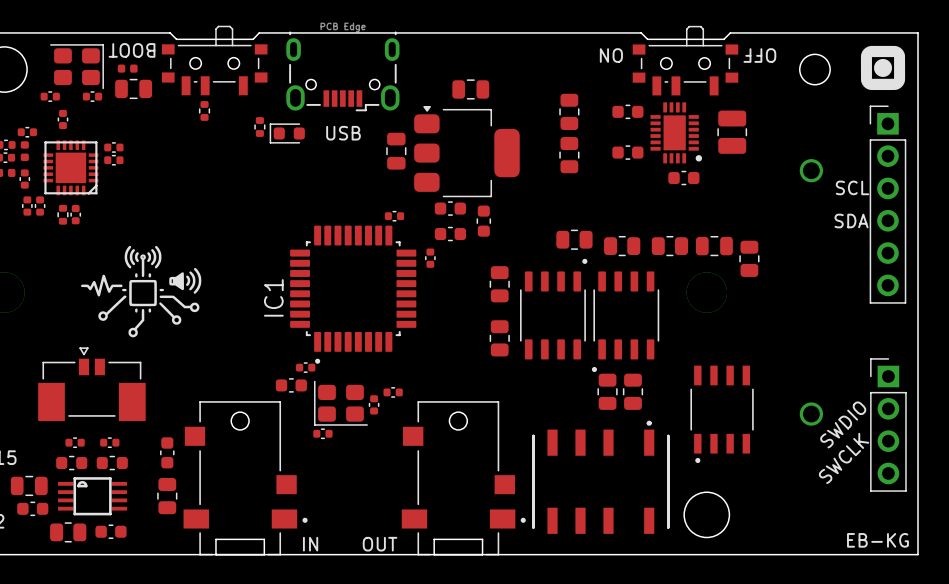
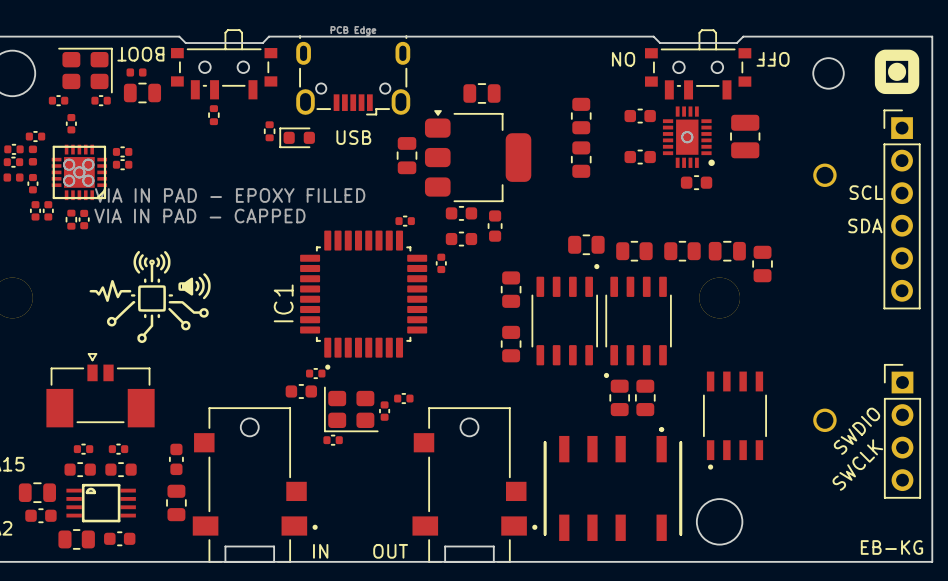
drawing: none -> [681, 131, 694, 143]
drawing: none -> [63, 158, 95, 187]
text: none -> VIA IN PAD - EPOXY FILLED (230, 195)
text: none -> VIA IN PAD - CAPPED (199, 216)

